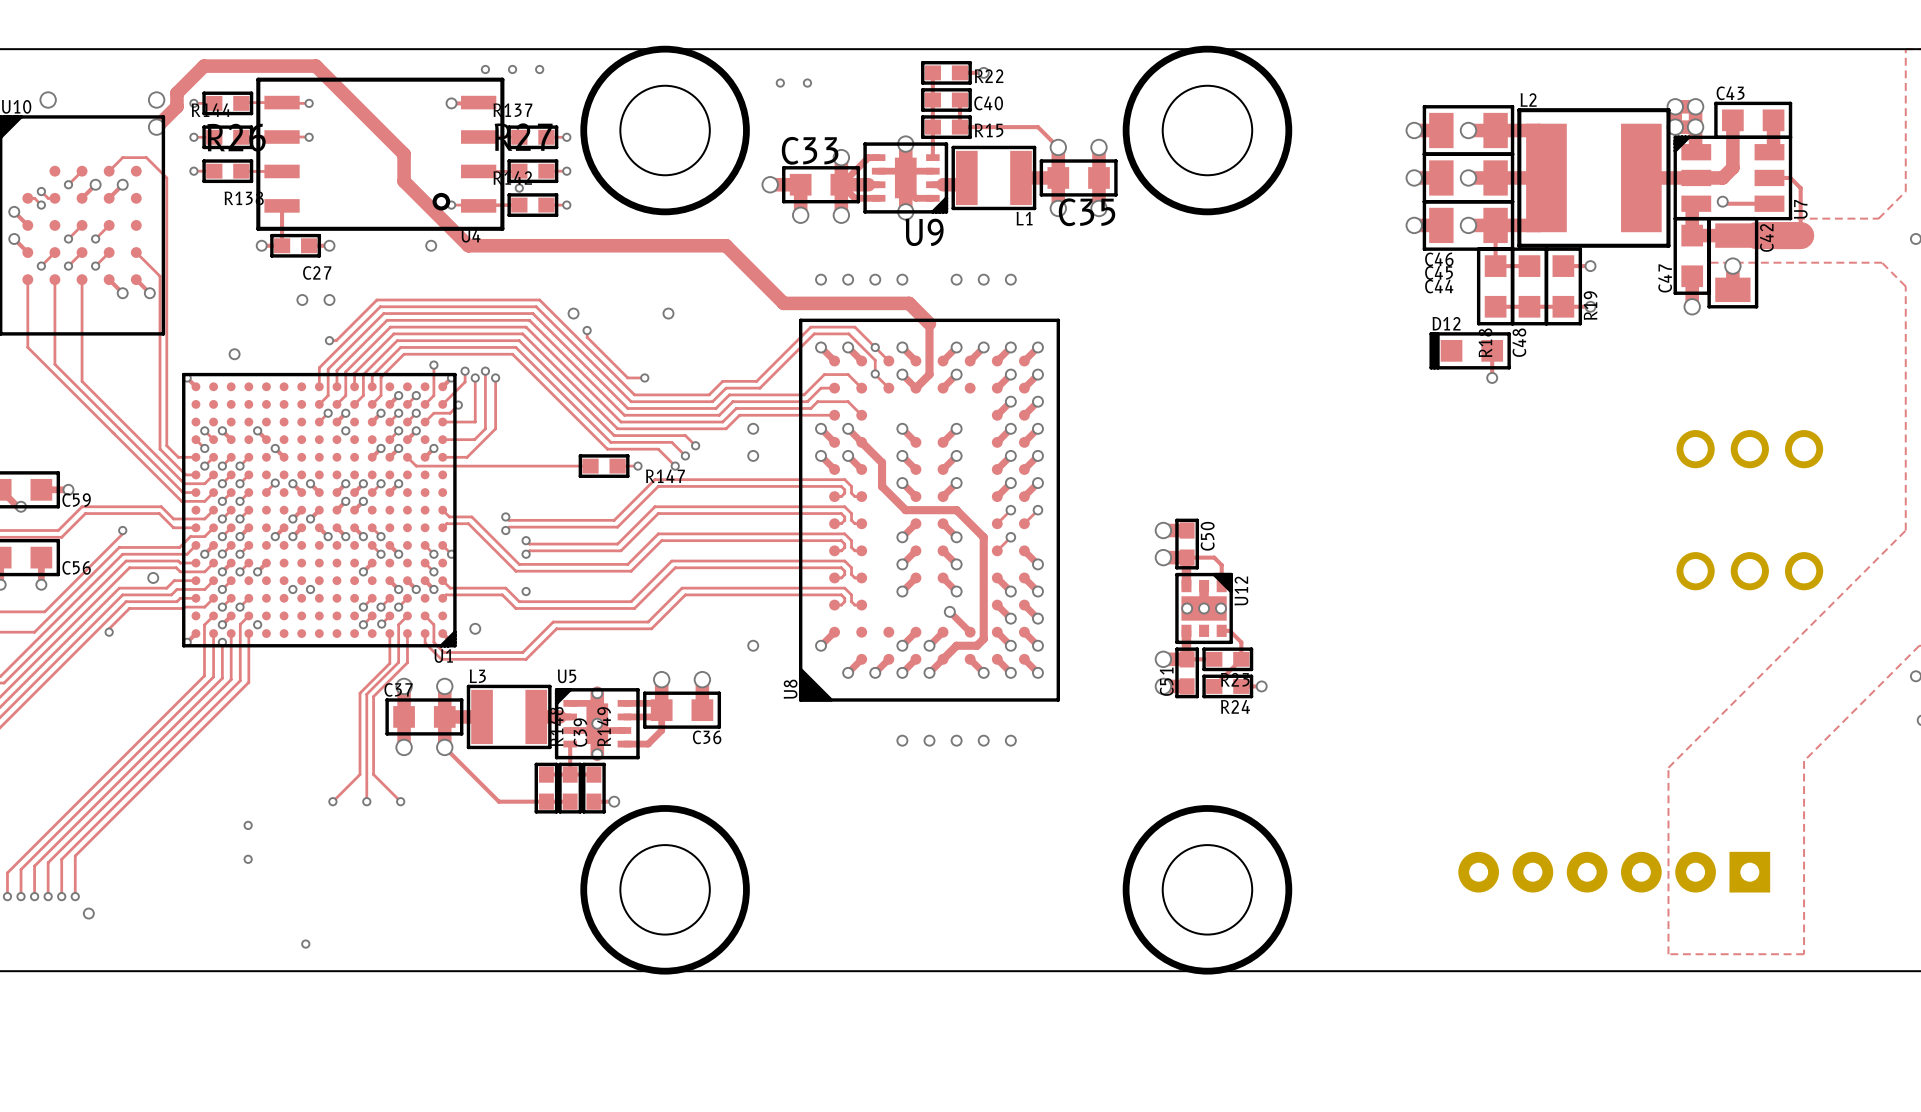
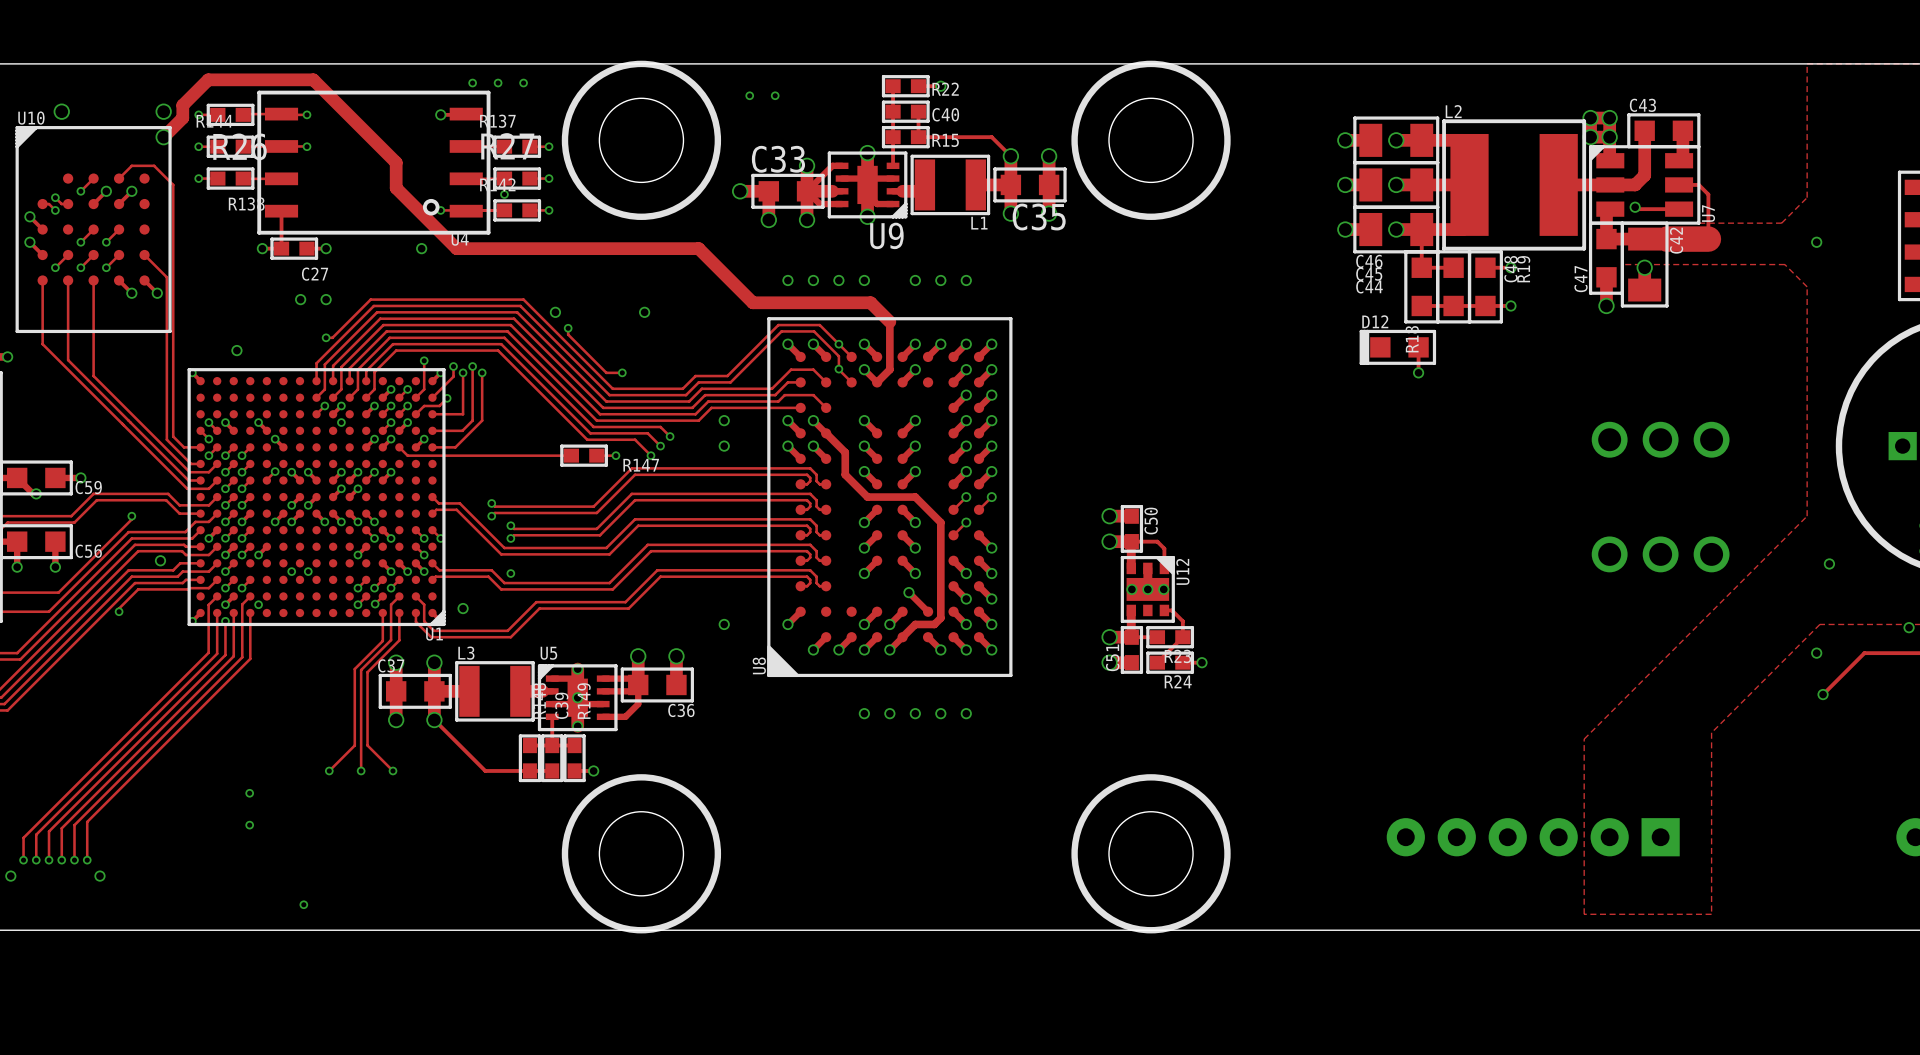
R19 name position: R19 (1590, 305) -> R19 (1523, 269)
C48 name position: C48 (1519, 342) -> C48 (1510, 269)

